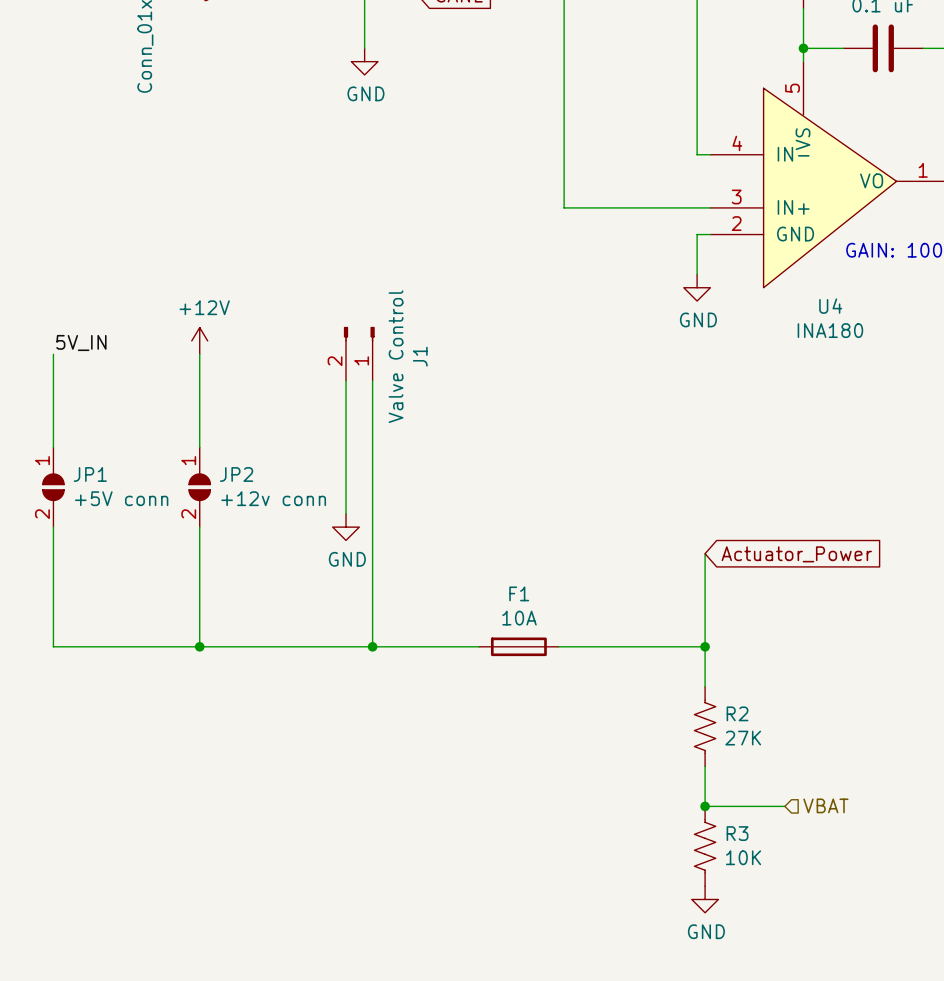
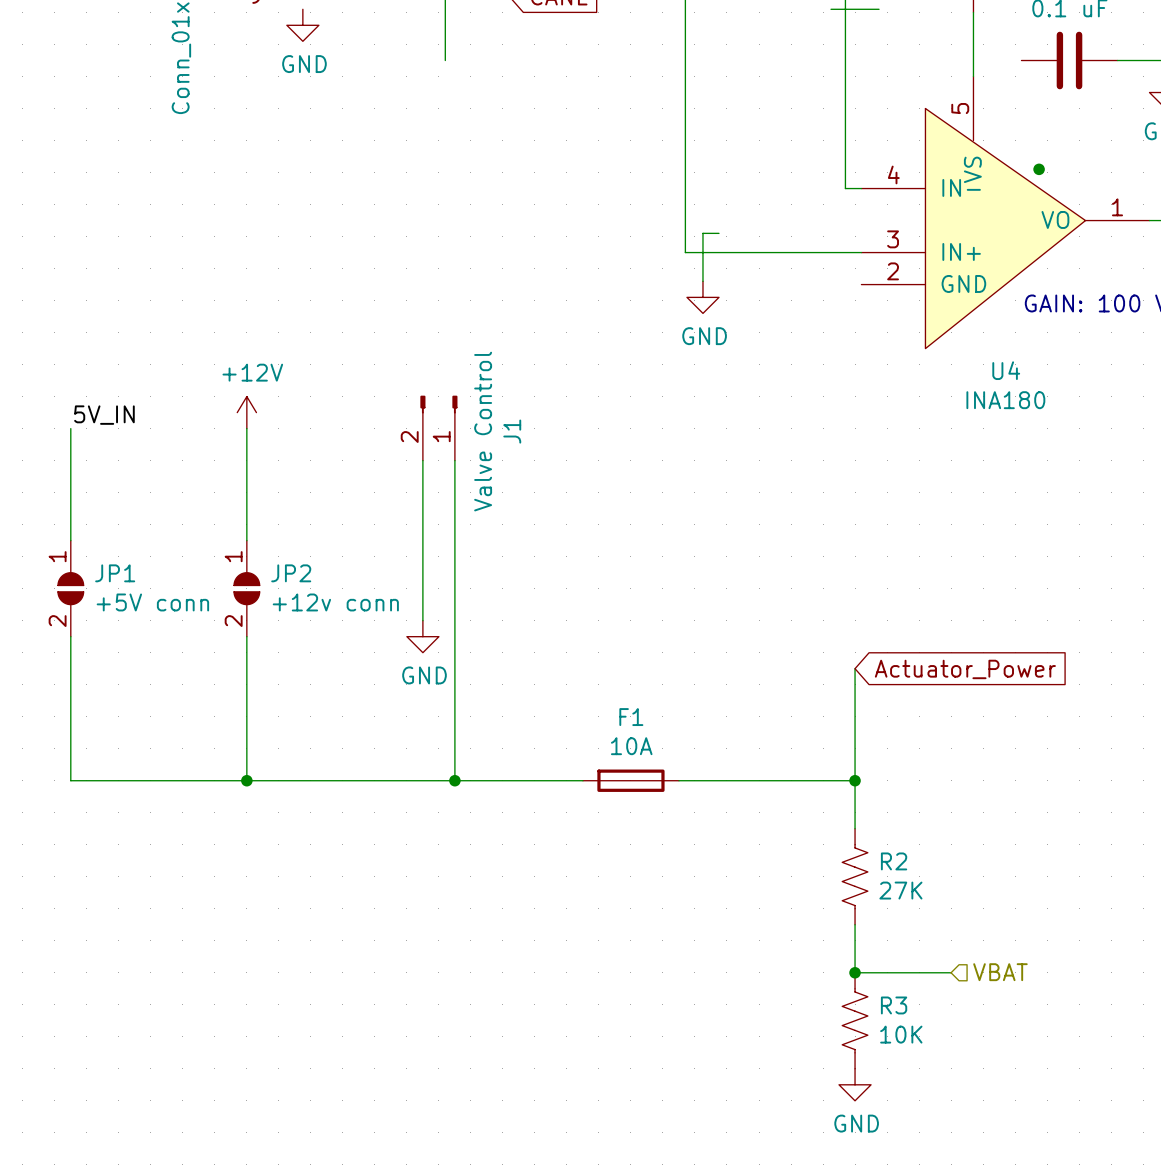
wire: (803, 48) (843, 48) -> (831, 9) (879, 9)
junction: (803, 48) -> none
power symbol position: GND (364, 61) -> GND (302, 25)
junction: none -> (1039, 169)
wire: (710, 234) (697, 234) (697, 274) -> (718, 233) (702, 233) (702, 281)
power symbol position: GND (697, 287) -> GND (702, 297)

